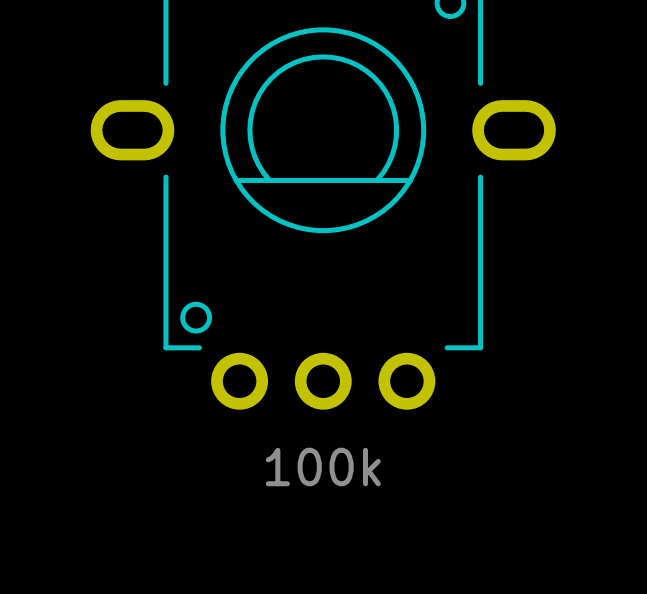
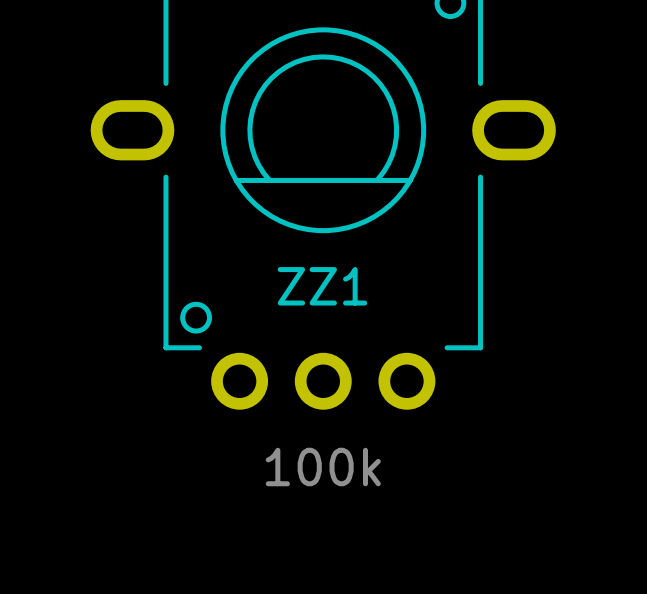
ZZ1 name: none -> ZZ1 (322, 286)

